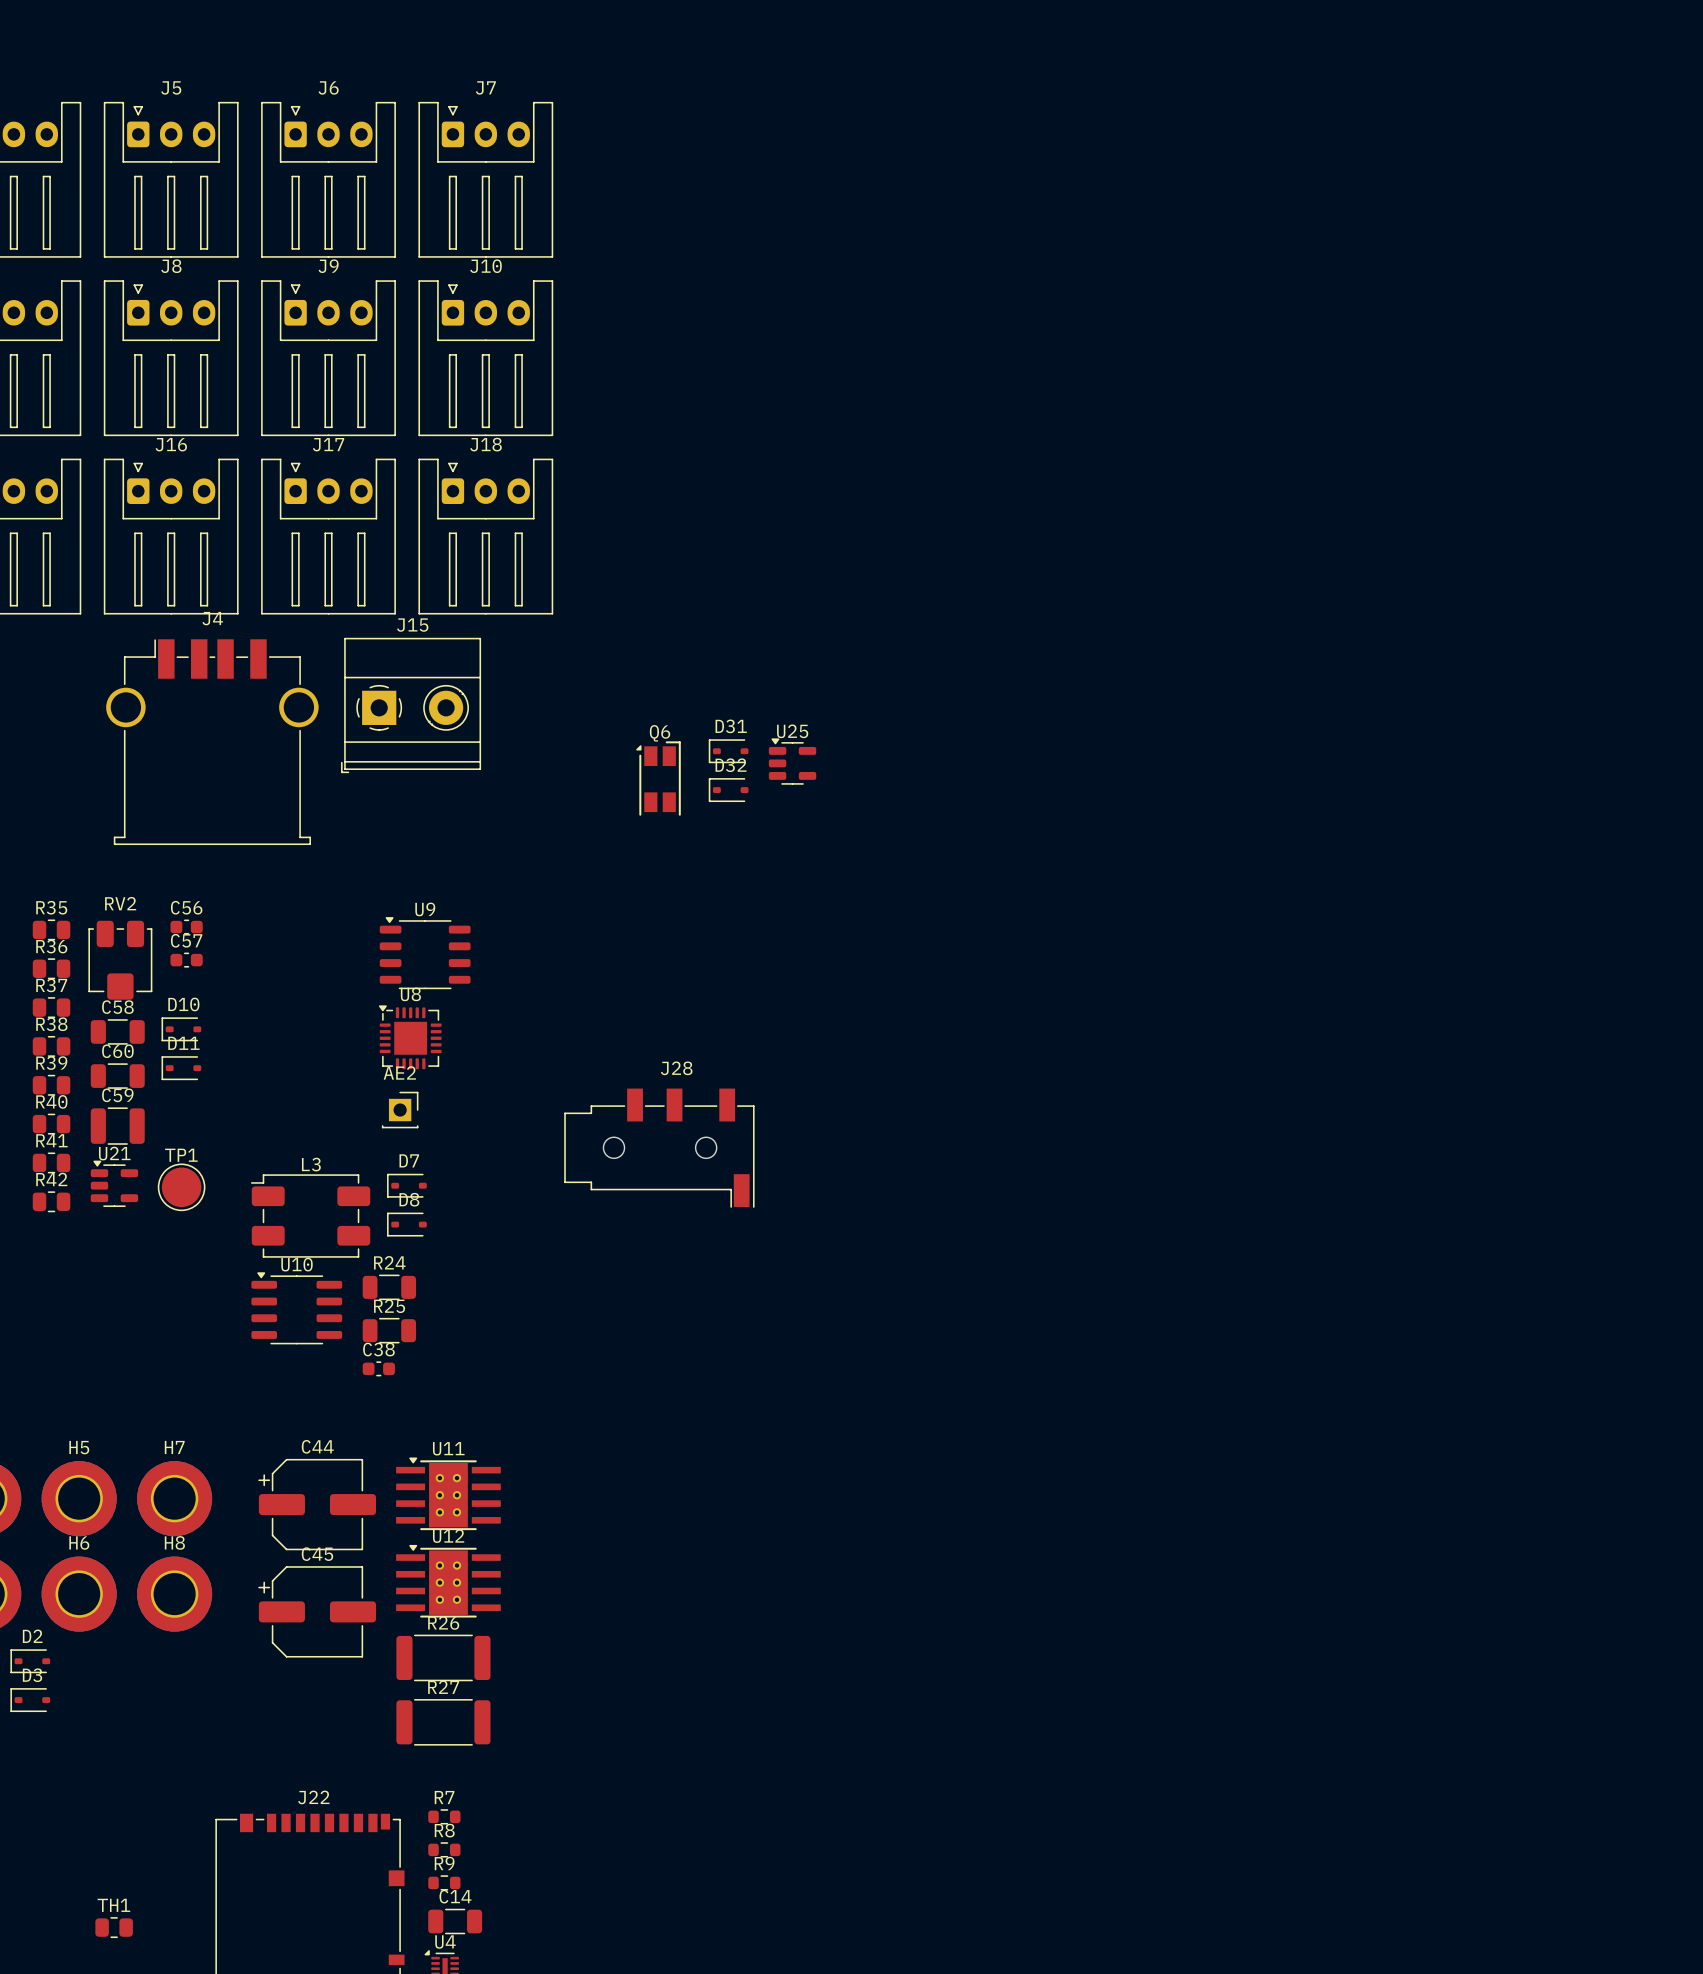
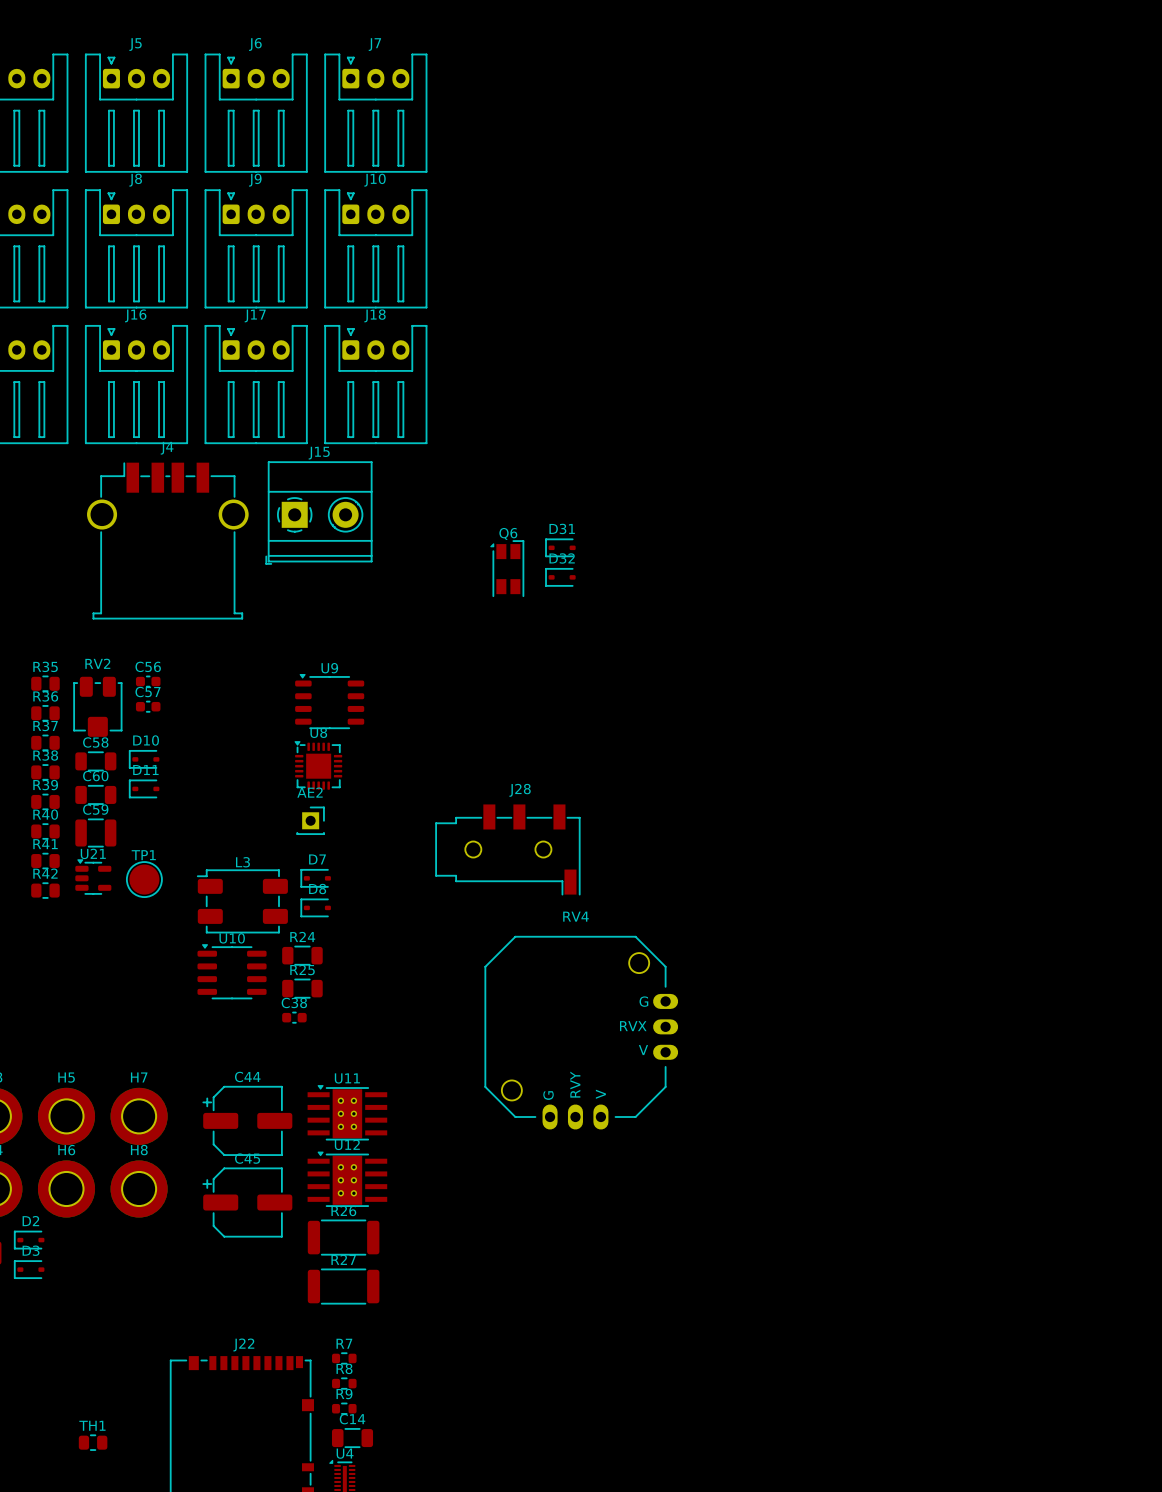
U25: (792, 761) -> none
RV4: none -> (581, 1032)

